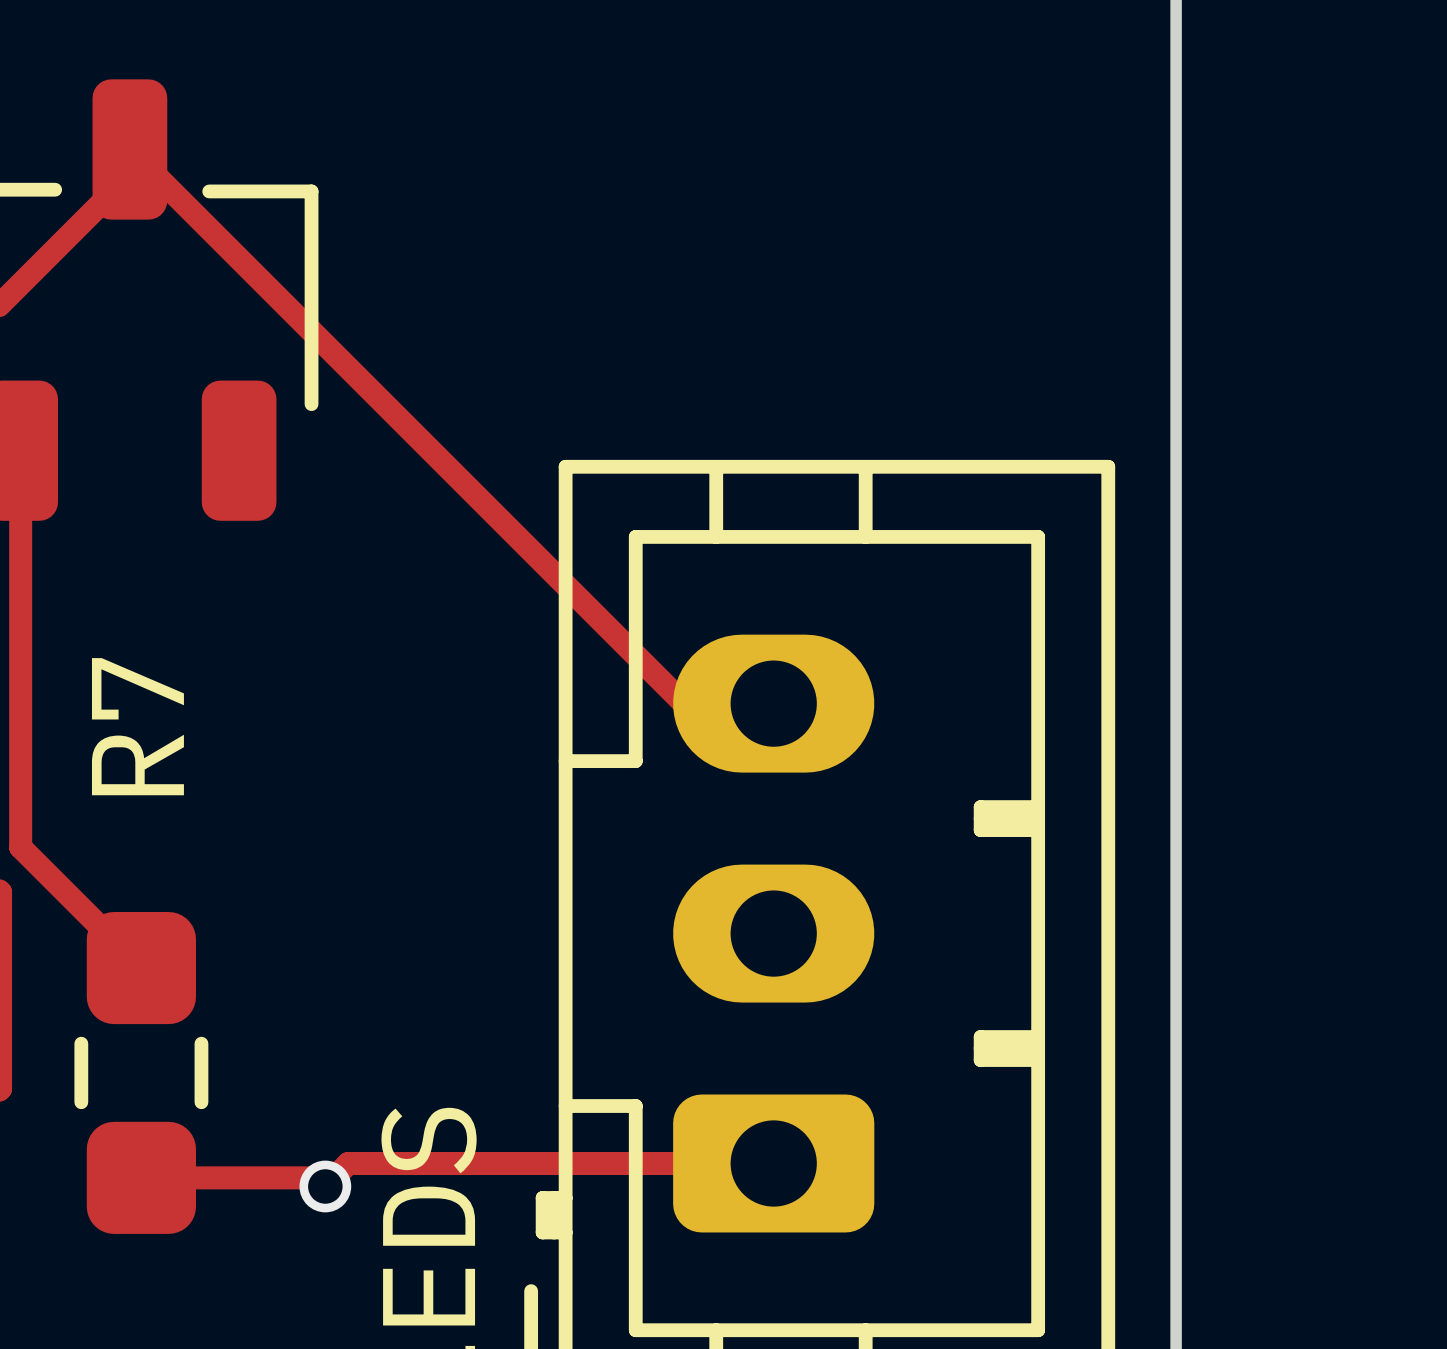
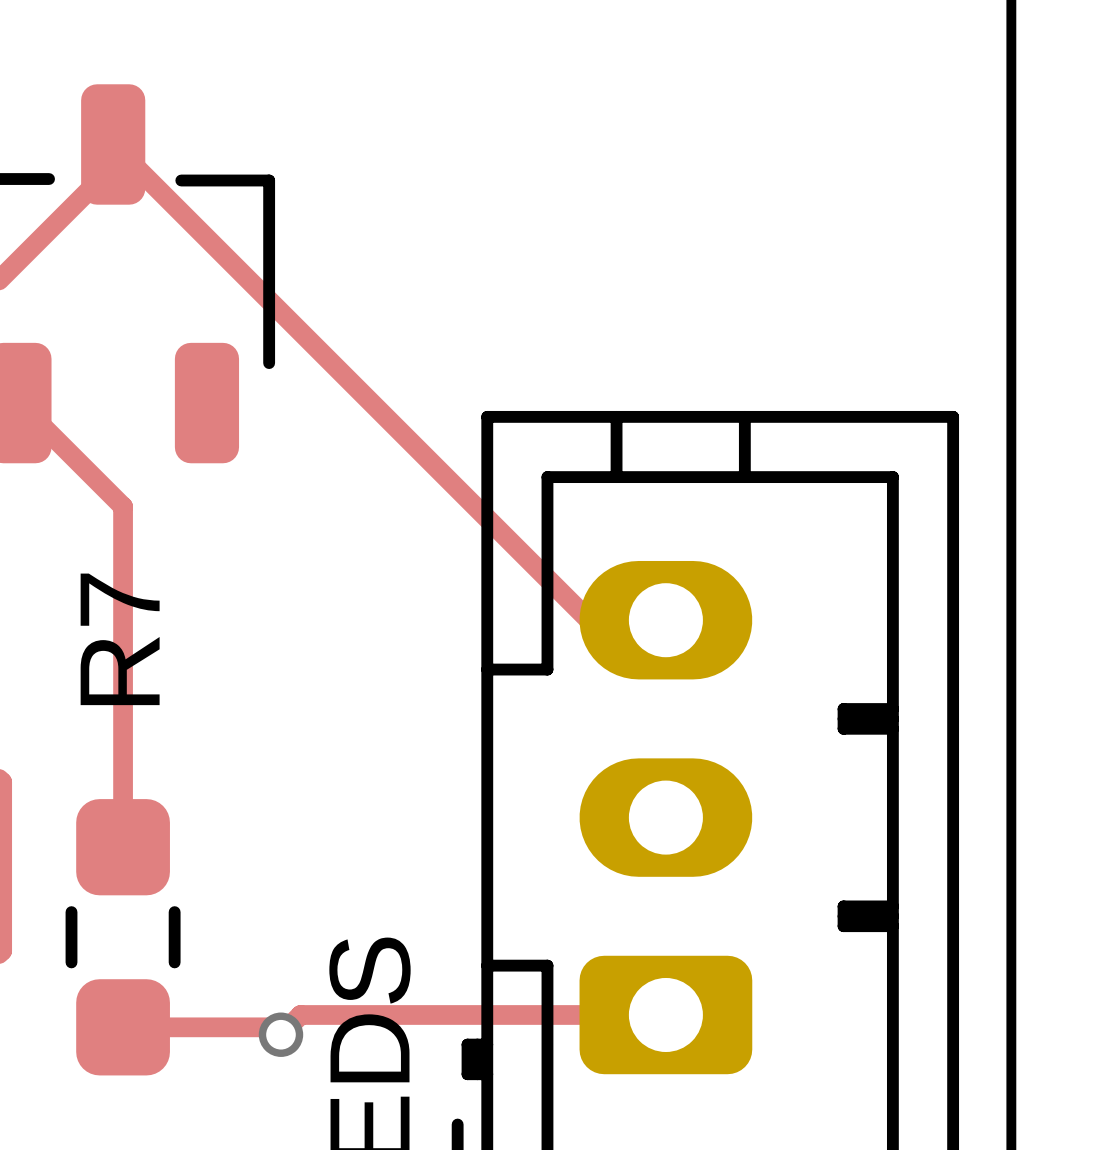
track: (20, 450) (20, 847) (141, 968) -> (19, 403) (123, 506) (123, 847)

